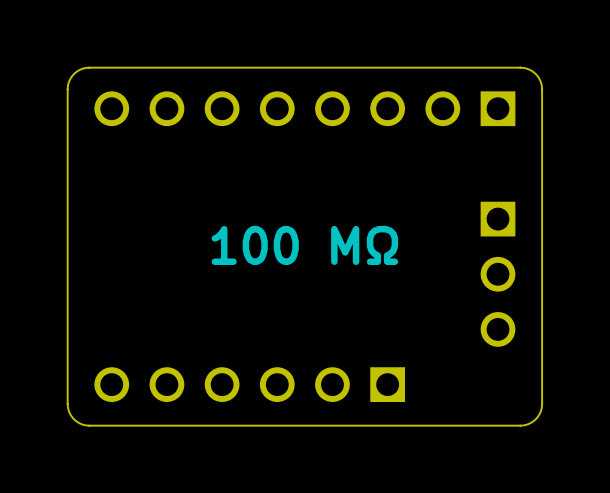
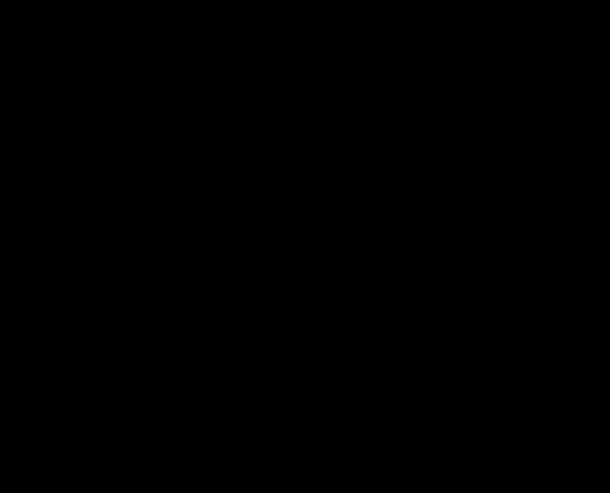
board edge: (520, 67) (89, 67) (75, 72) (69, 79) (67, 89) (67, 403) (72, 417) (79, 423) (89, 425) (520, 425) (533, 420) (539, 413) (542, 403) (542, 89) (539, 79) (535, 74) (529, 69) (520, 67) -> none
part: (304, 108) -> none
text: 100 MΩ (304, 245) -> none
part: (498, 274) -> none
part: (249, 384) -> none

